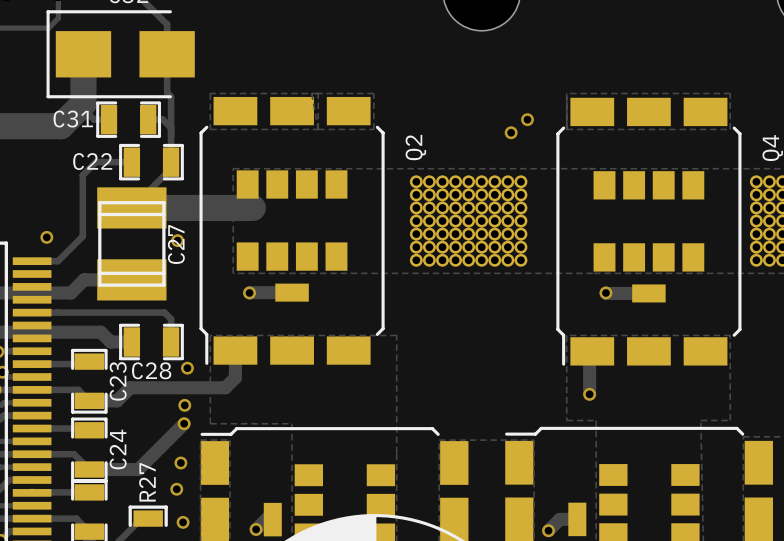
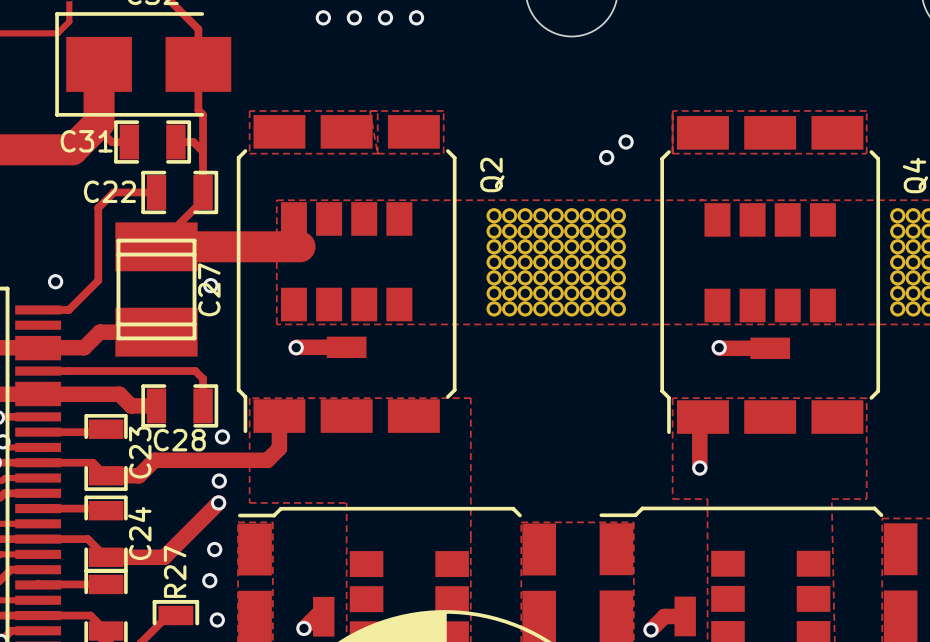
via: none -> (323, 17)
via: none -> (354, 17)
via: none -> (385, 17)
via: none -> (416, 17)

